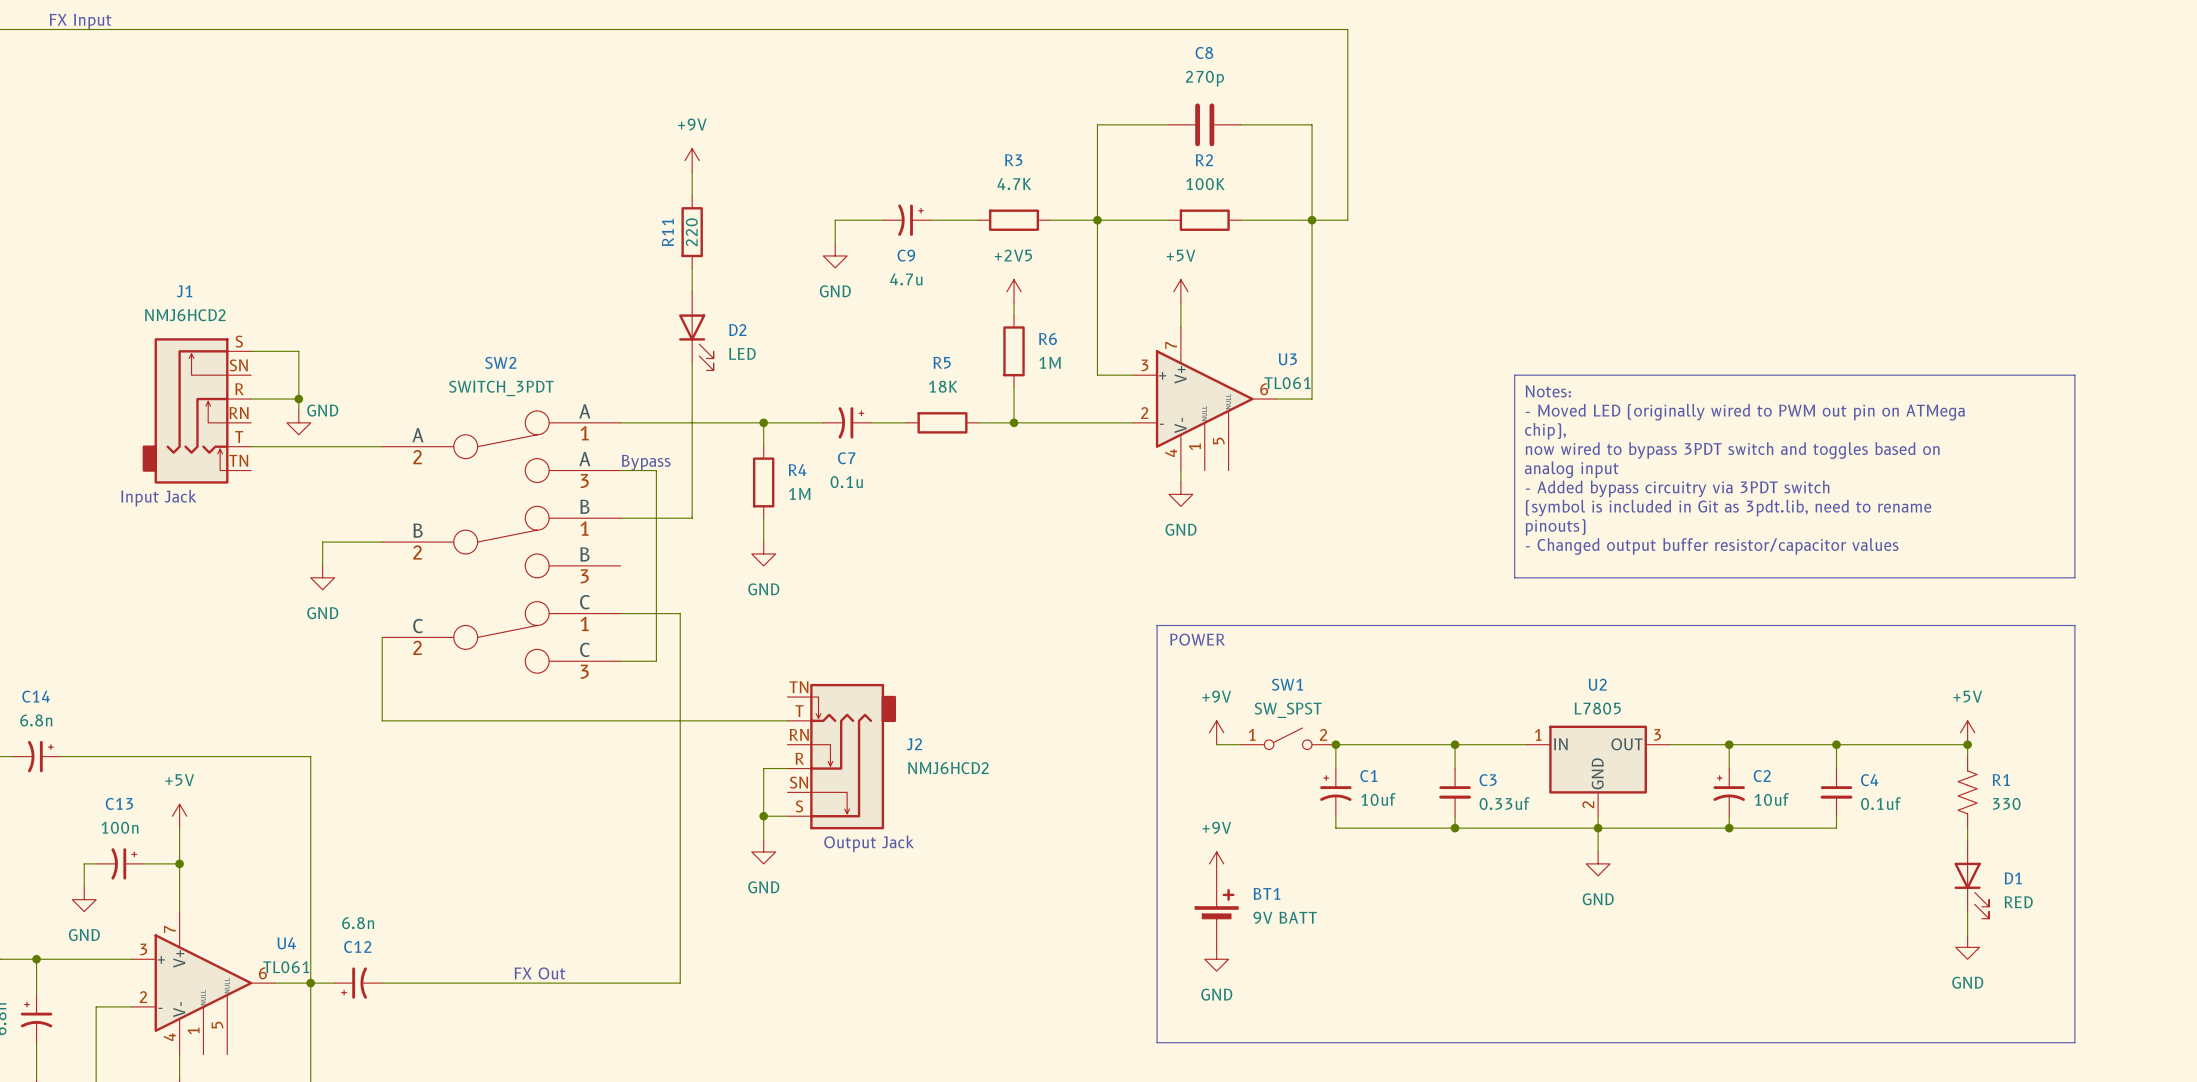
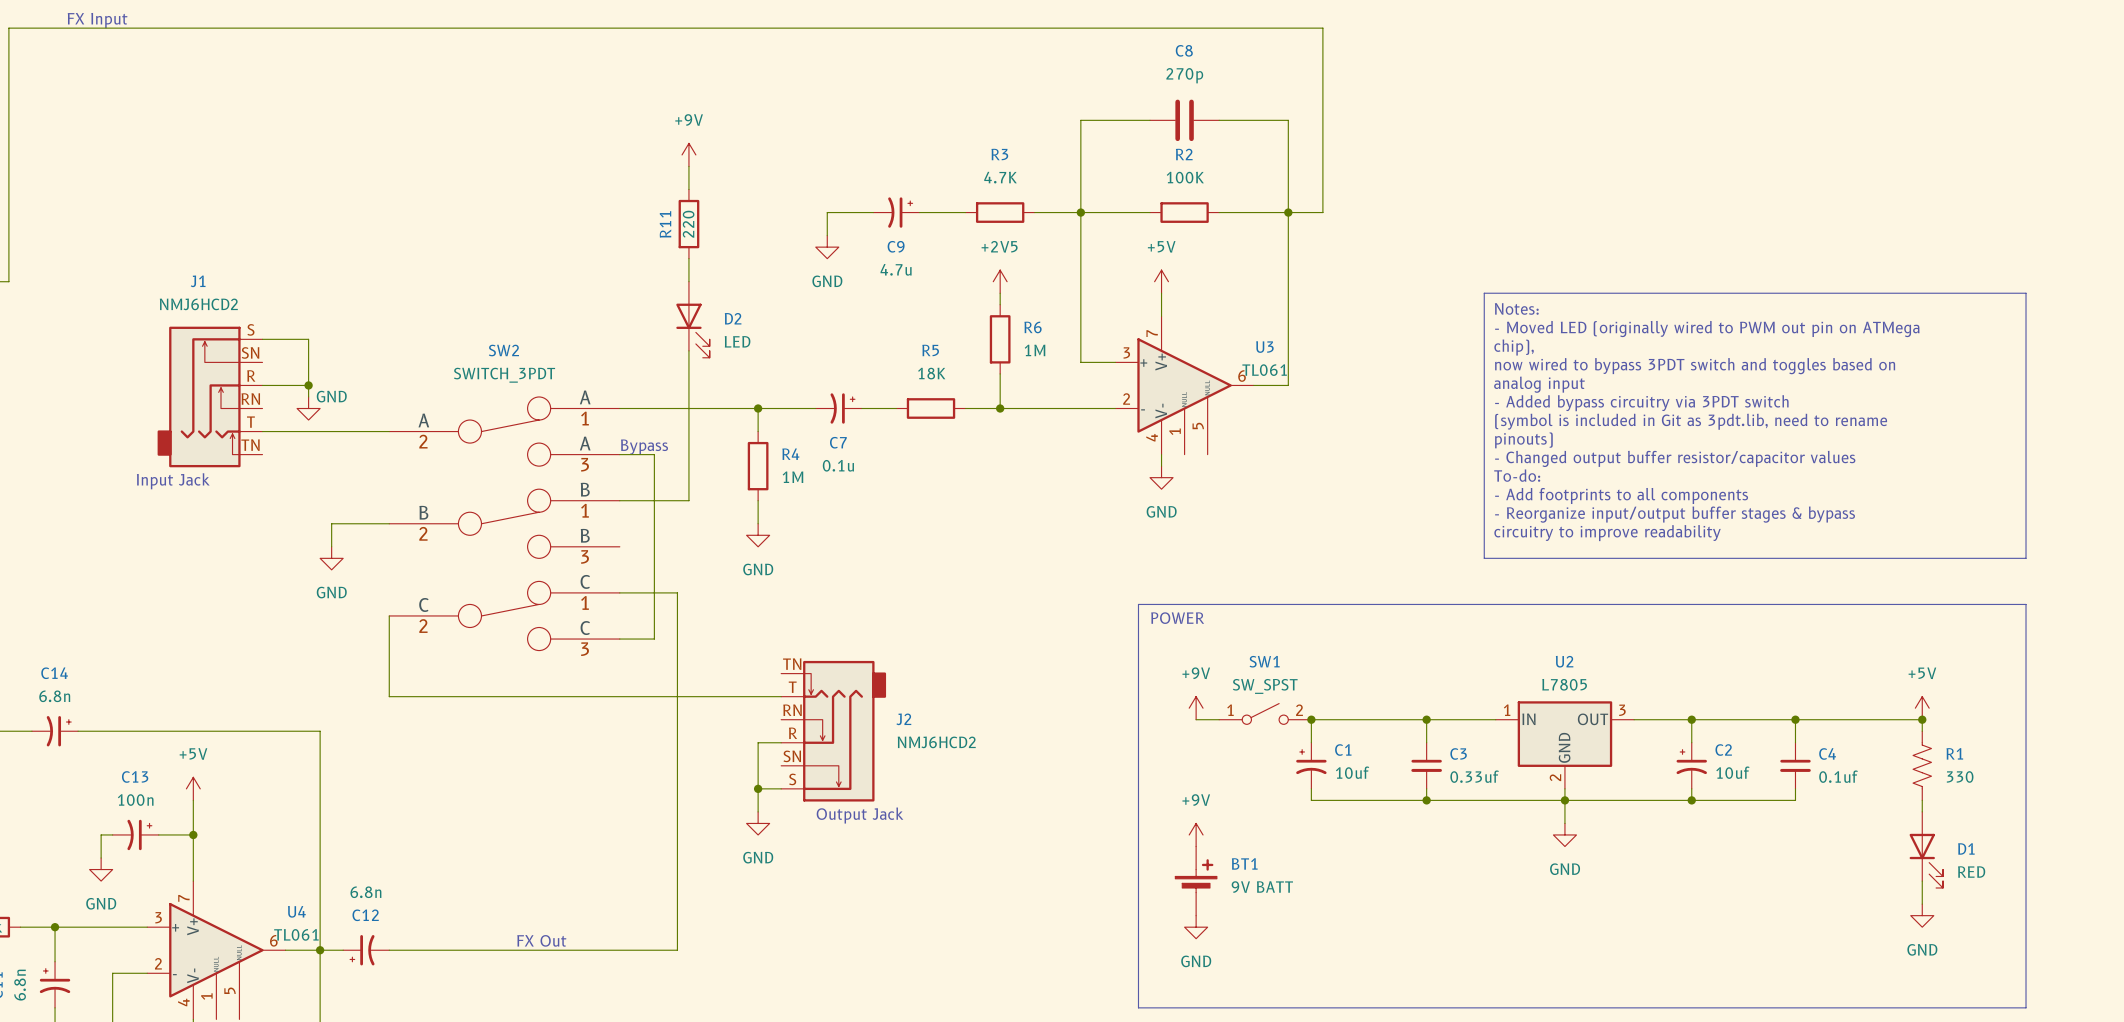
line: (1514, 375) (2074, 375) -> (1484, 362) (1484, 293) (2026, 293) (2026, 362)
text position: Notes: (1548, 391) -> Notes: (1516, 308)
text position: - Moved LED (originally wired to PWM out pin on ATMega (1745, 412) -> - Moved LED (originally wired to PWM out pin on ATMega (1707, 329)
text position: chip), (1545, 431) -> chip), (1514, 347)
text position: now wired to bypass 3PDT switch and toggles based on (1732, 450) -> now wired to bypass 3PDT switch and toggles based on (1695, 366)
text position: analog input (1571, 469) -> analog input (1539, 384)
text position: - Added bypass circuitry via 3PDT switch (1677, 488) -> - Added bypass circuitry via 3PDT switch (1641, 403)
text: none -> To-do: (1517, 475)
text position: (symbol is included in Git as 3pdt.lib, need to rename (1728, 508) -> (symbol is included in Git as 3pdt.lib, need to rename (1691, 421)
text: none -> - Add footprints to all components (1621, 495)
text position: pinouts) (1555, 527) -> pinouts) (1523, 440)
text: none -> - Reorganize input/output buffer stages & bypass (1675, 514)
text position: - Changed output buffer resistor/capacitor values (1712, 546) -> - Changed output buffer resistor/capacitor values (1675, 458)
text: none -> circuitry to improve readability (1607, 533)

